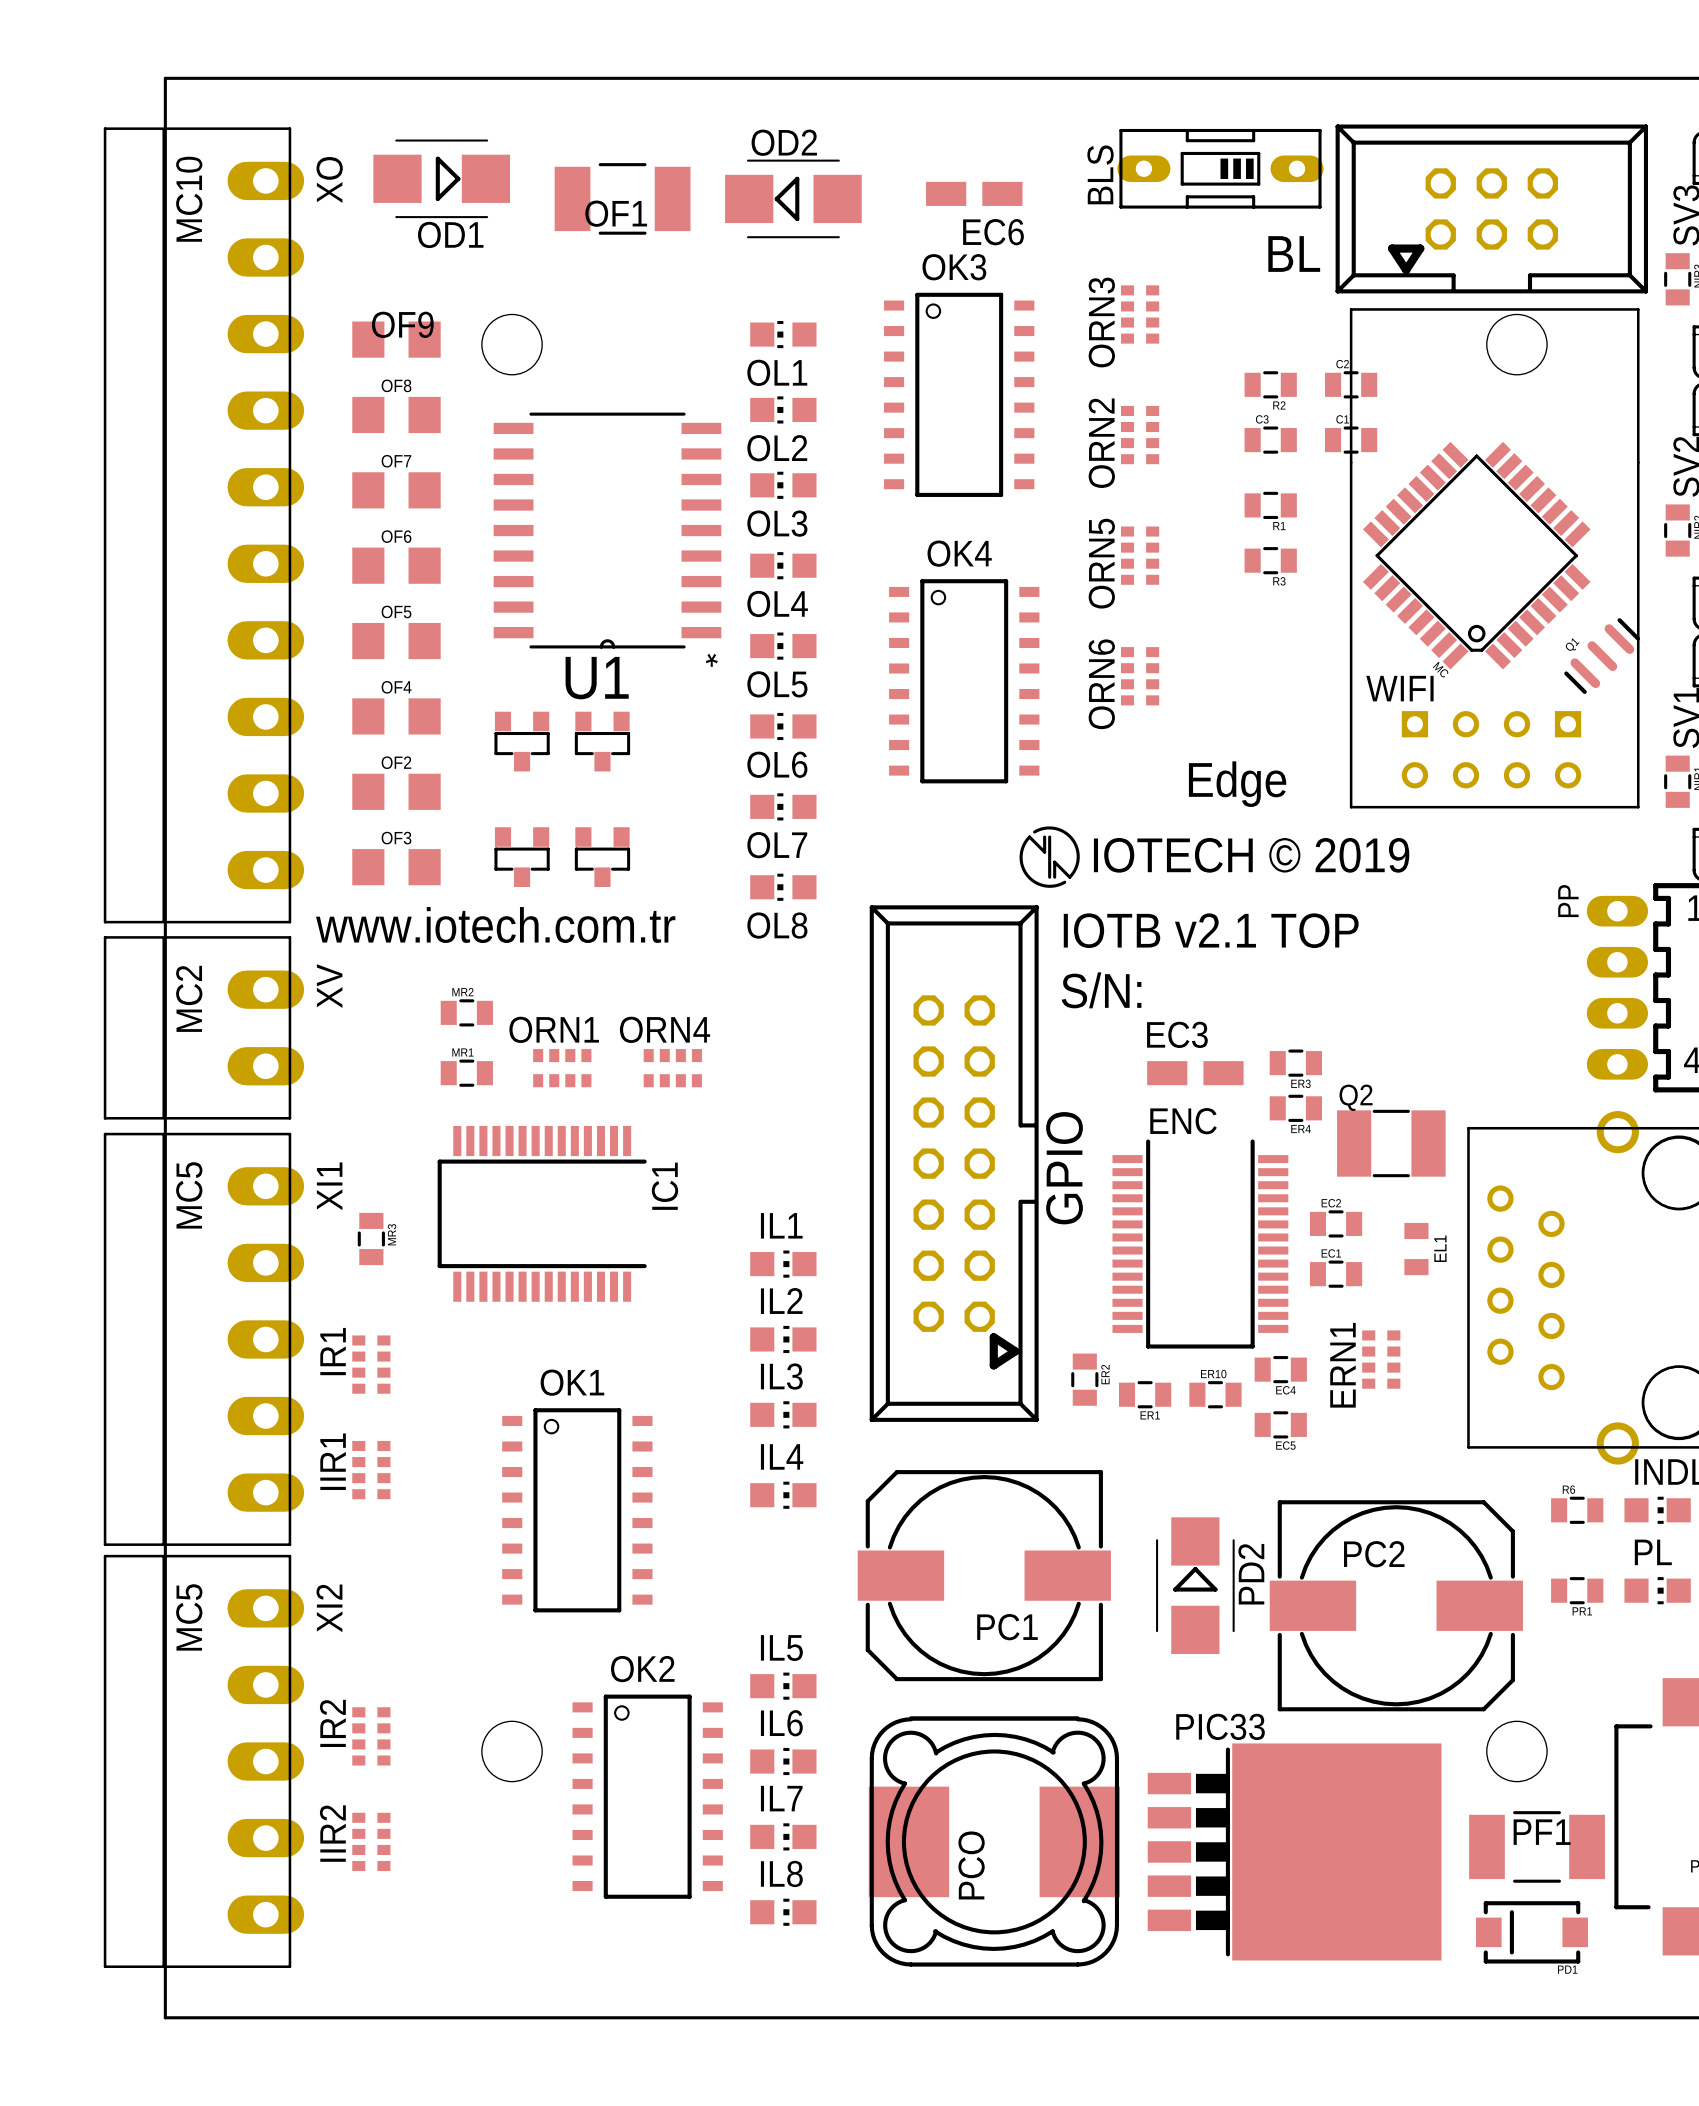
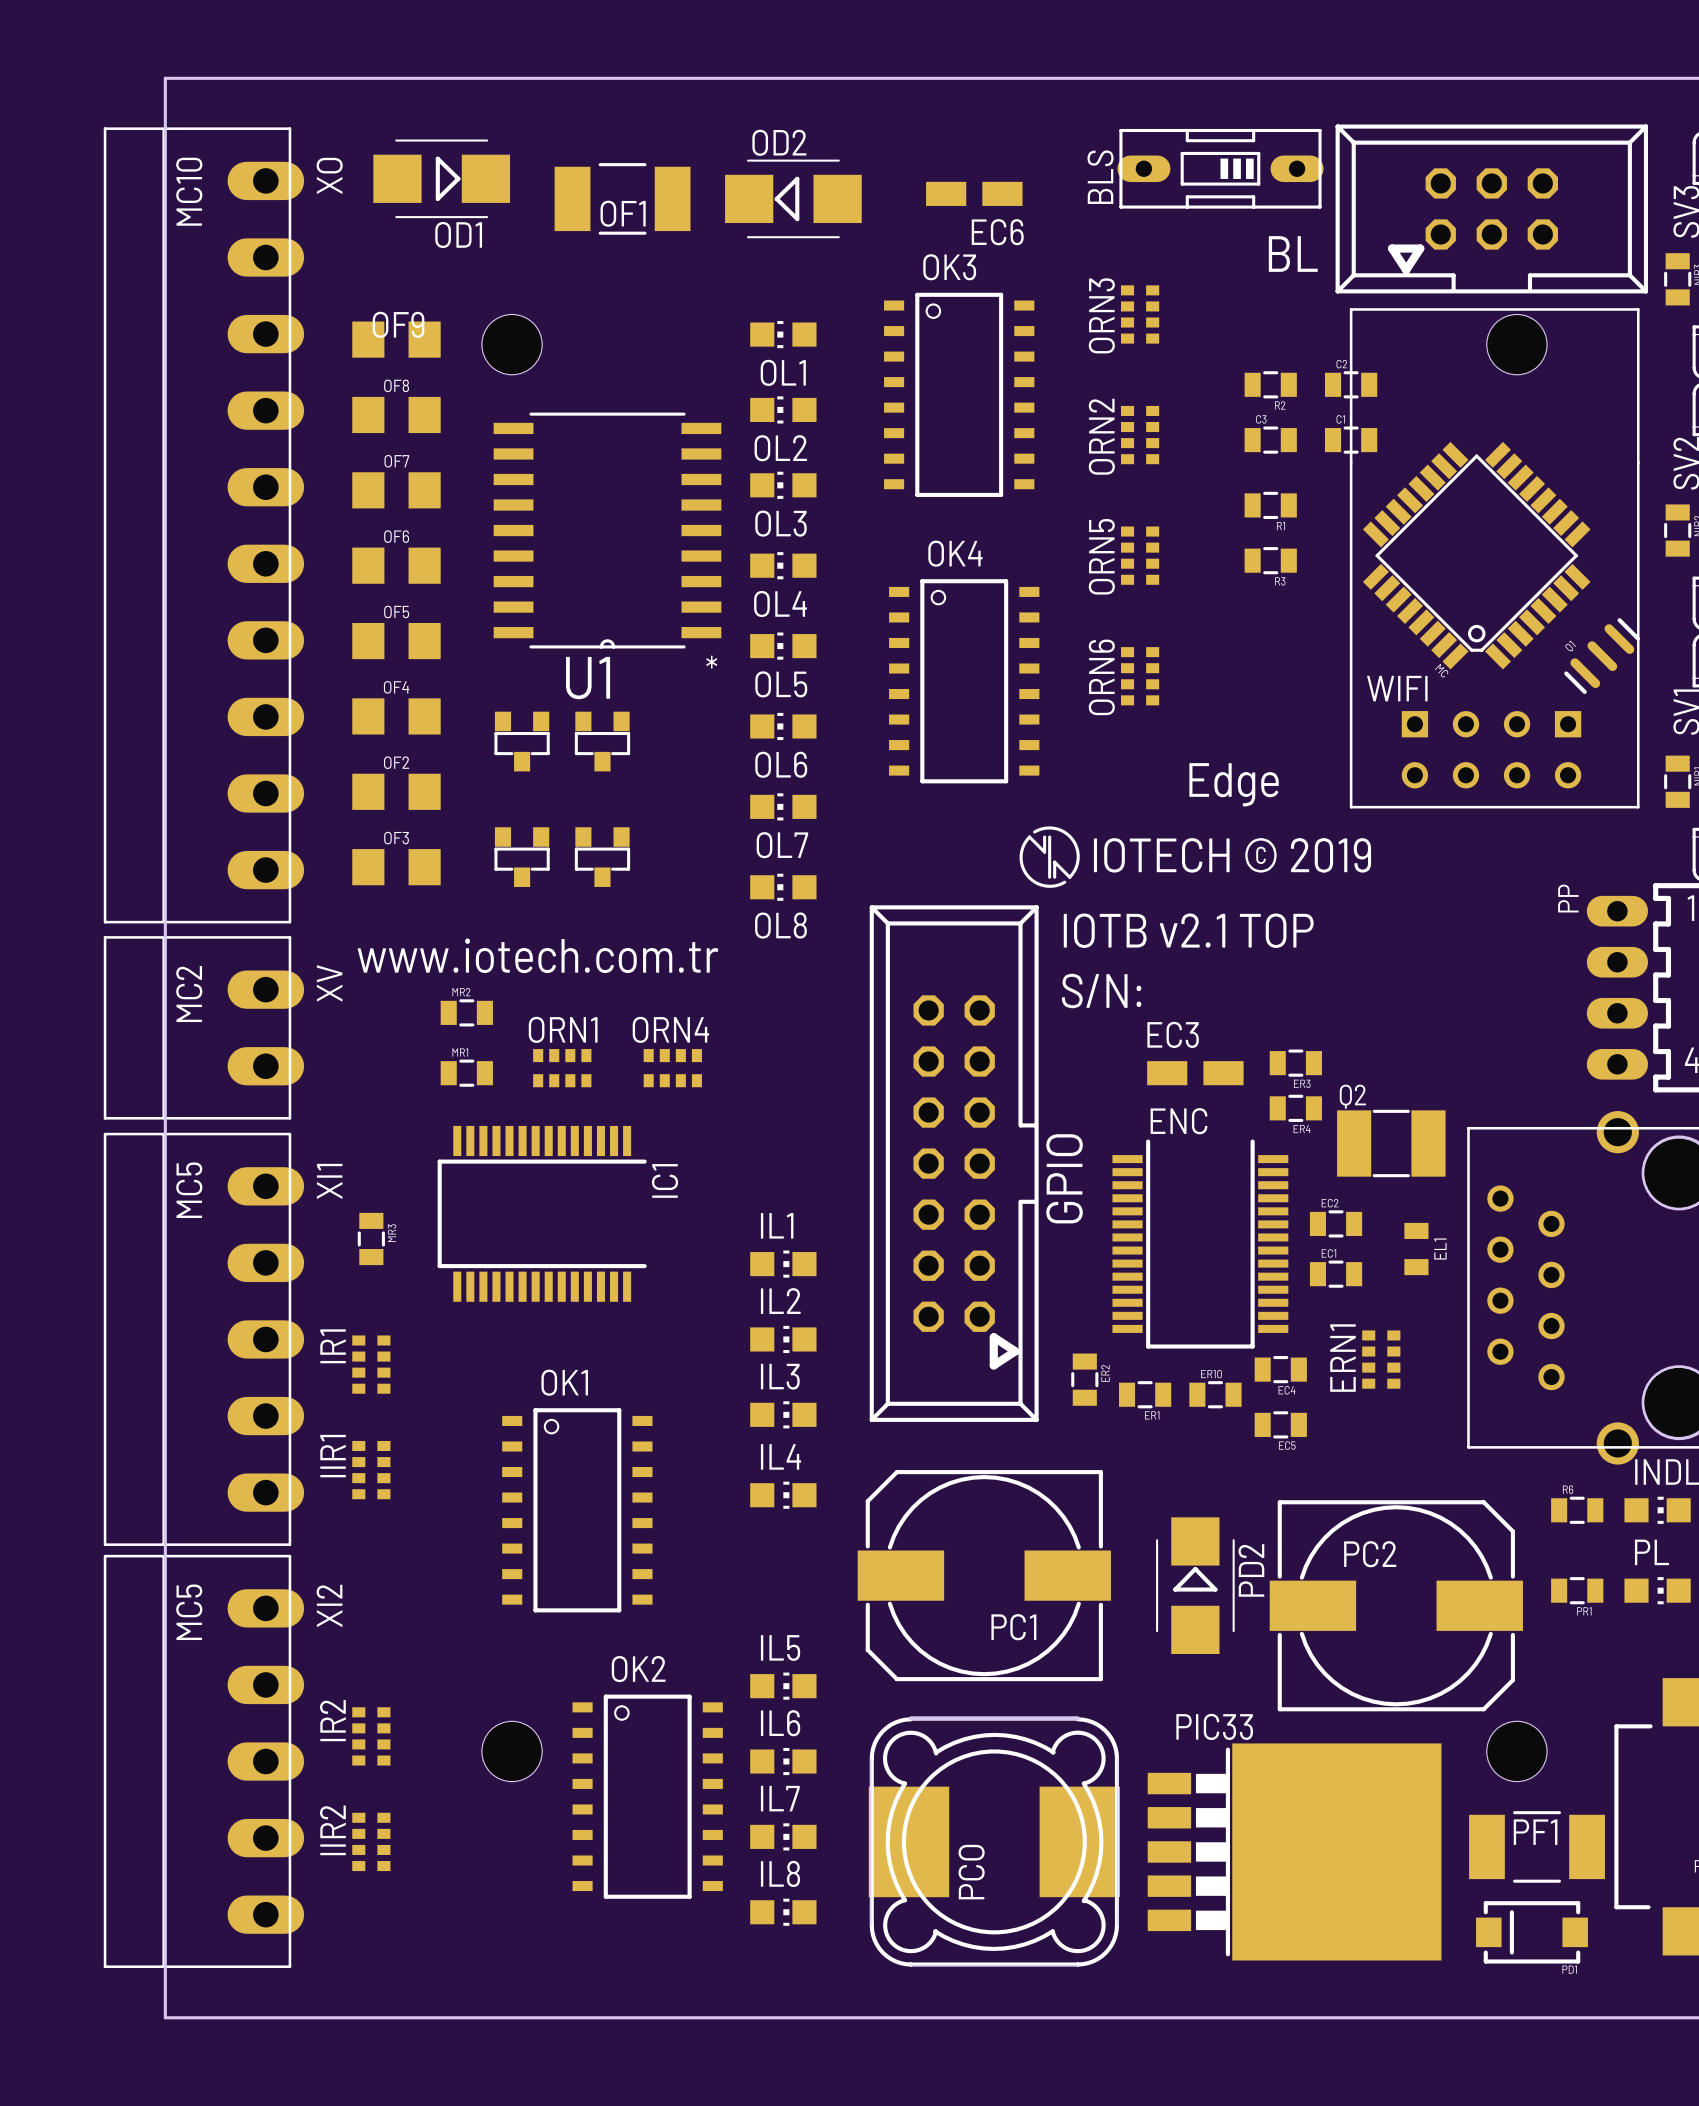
text position: www.iotech.com.tr (495, 925) -> www.iotech.com.tr (537, 955)

